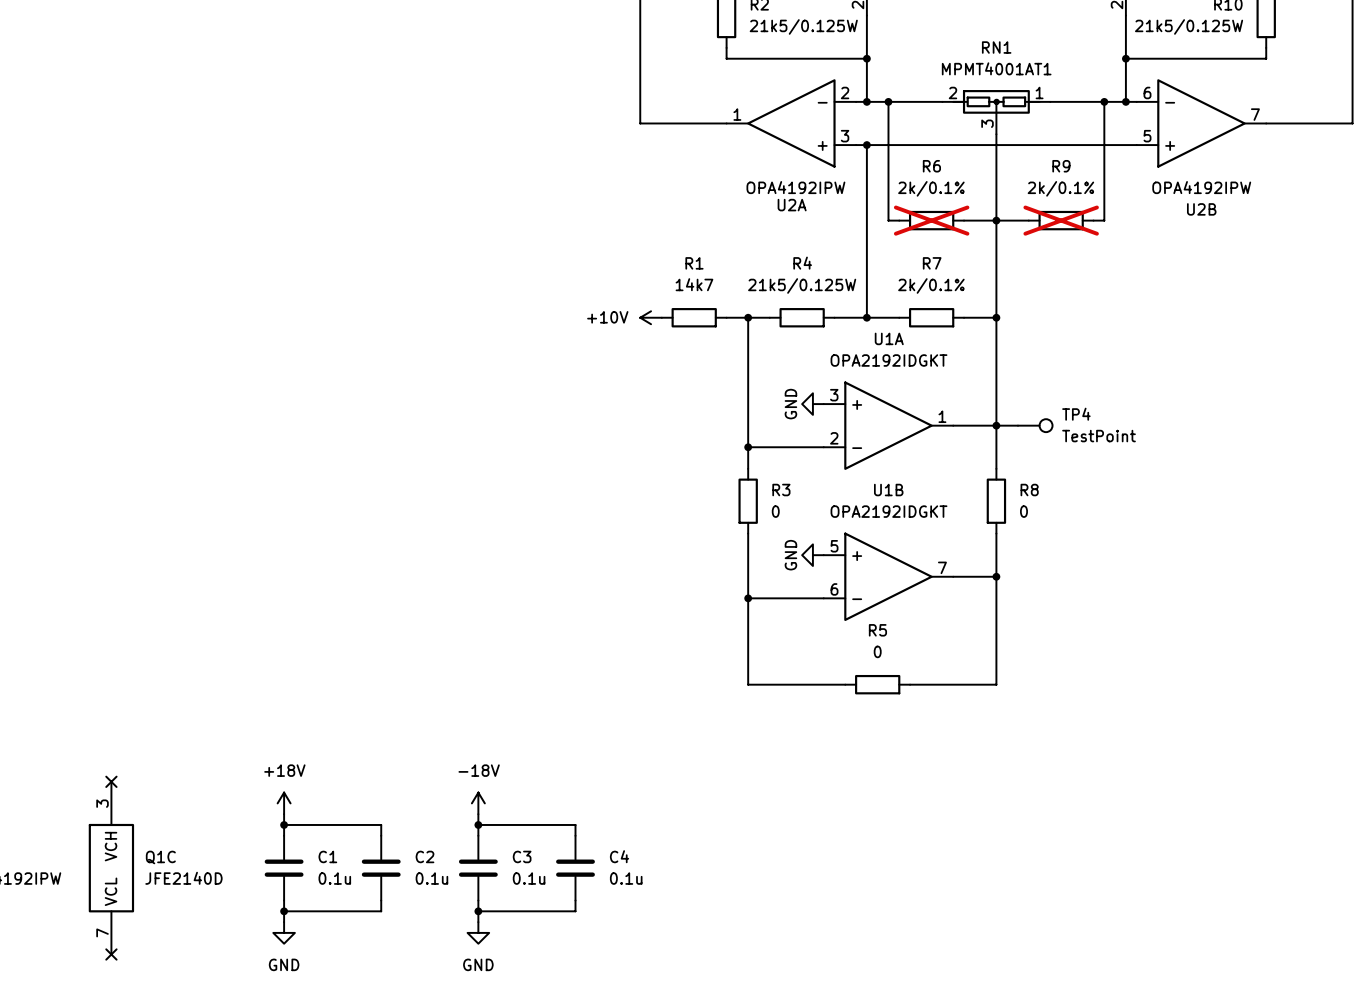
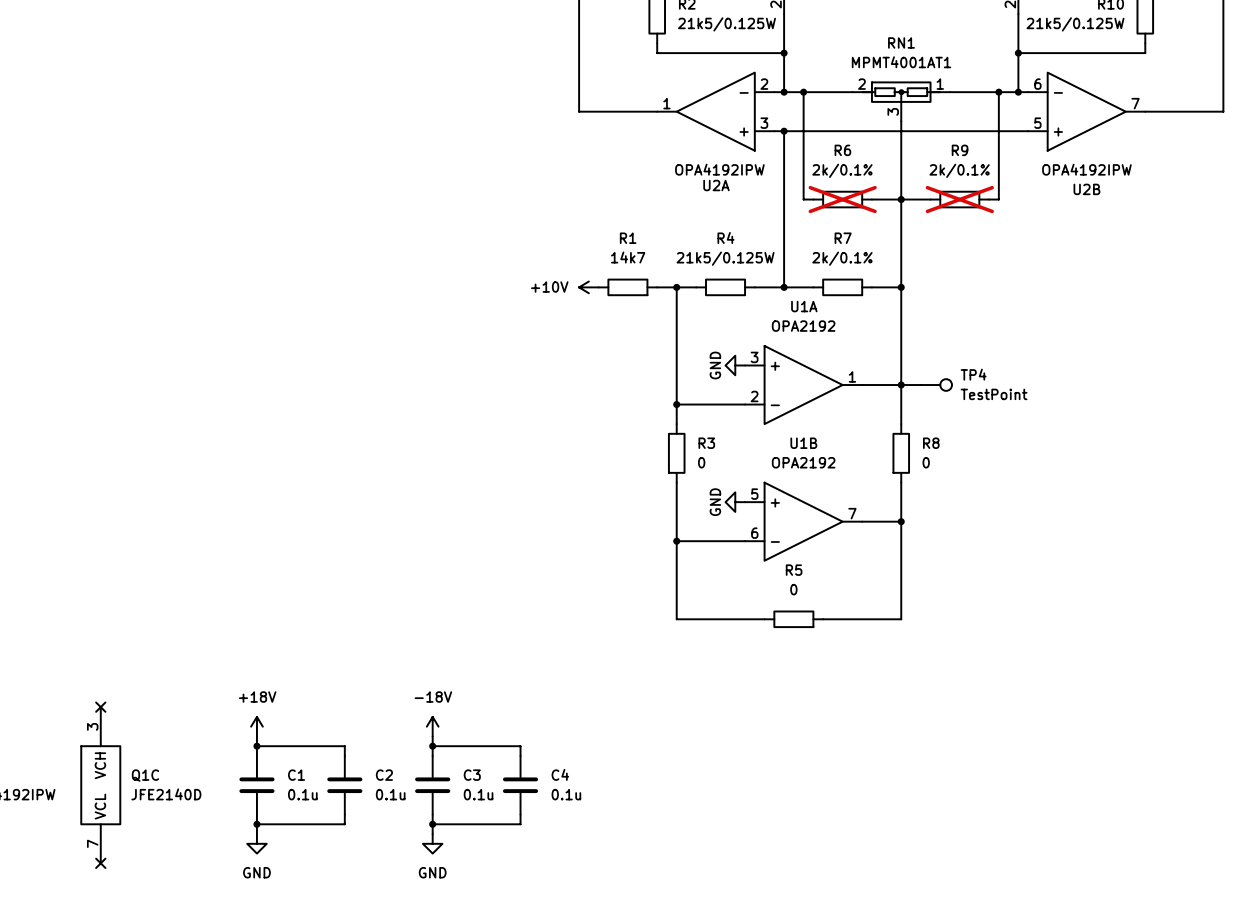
U1A value: OPA2192IDGKT (888, 360) -> OPA2192 (803, 326)
U1B value: OPA2192IDGKT (888, 511) -> OPA2192 (803, 462)

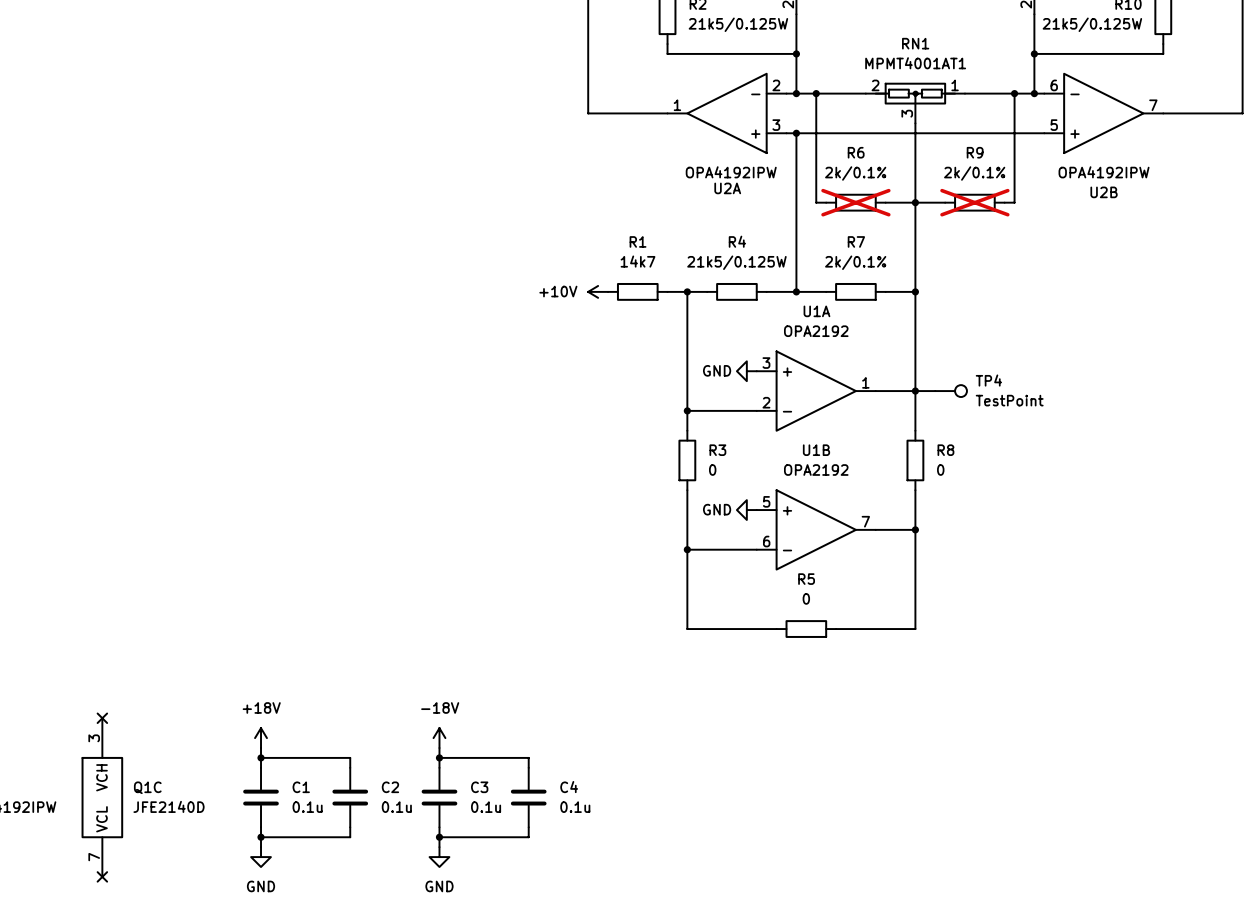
power symbol text rotation: 0° (715, 365) -> 90° clockwise (717, 370)
power symbol text rotation: 0° (715, 502) -> 90° clockwise (717, 509)

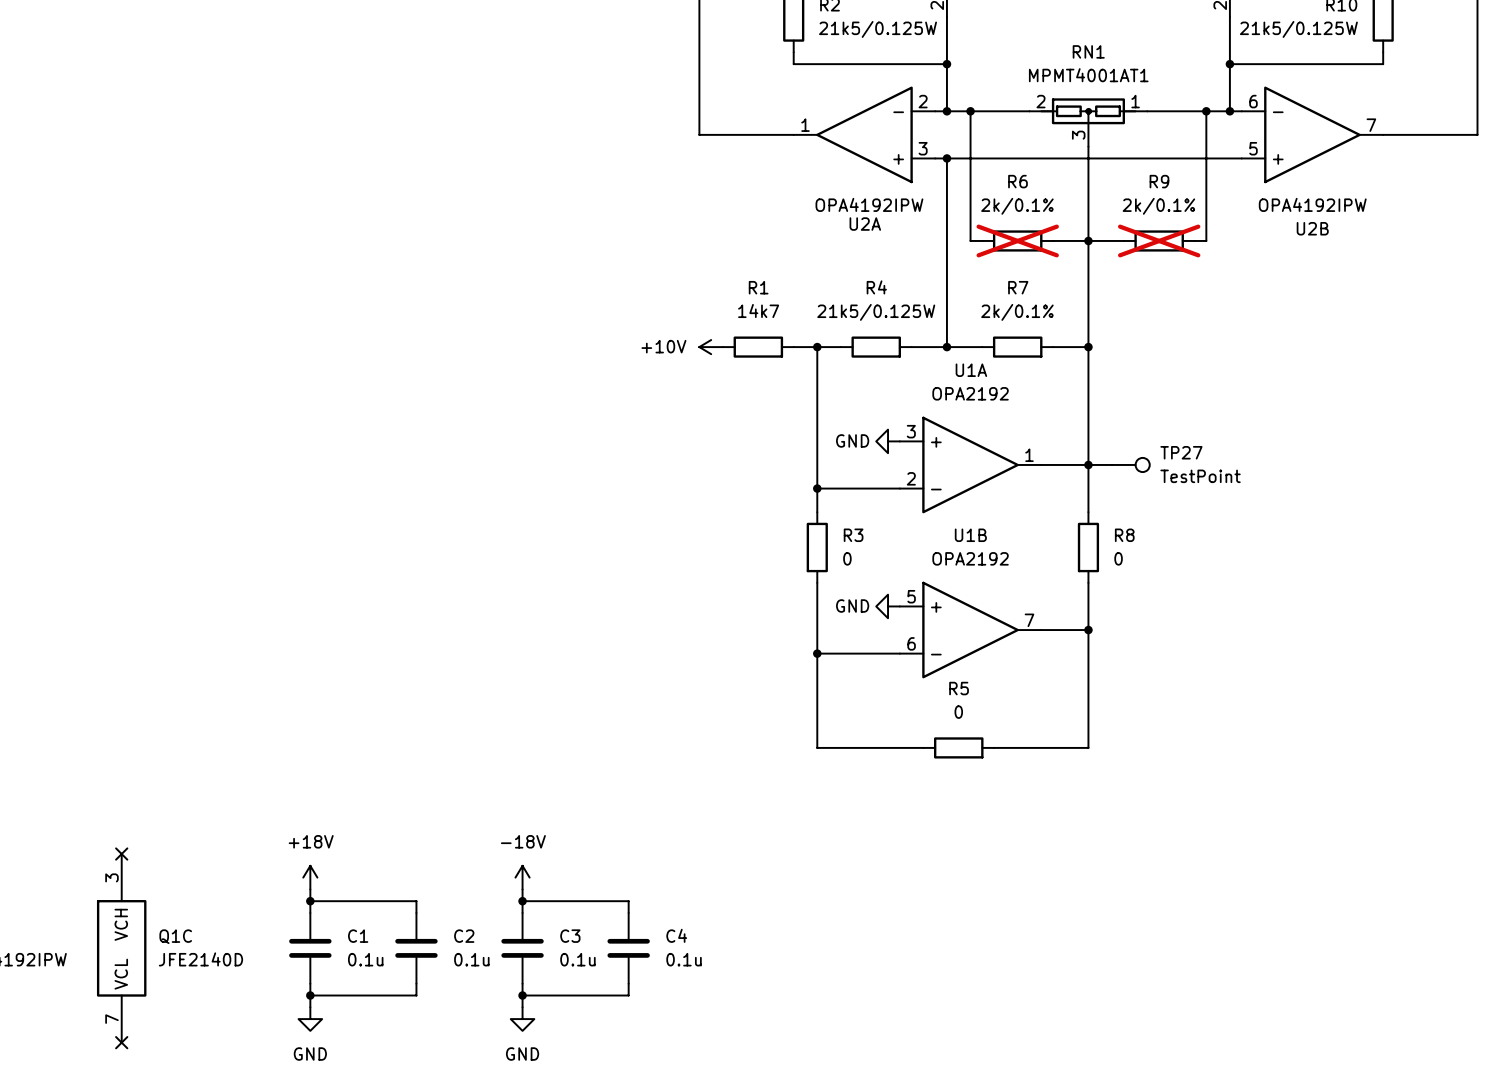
TP4 name: TP4 (988, 380) -> TP27 (1181, 452)

